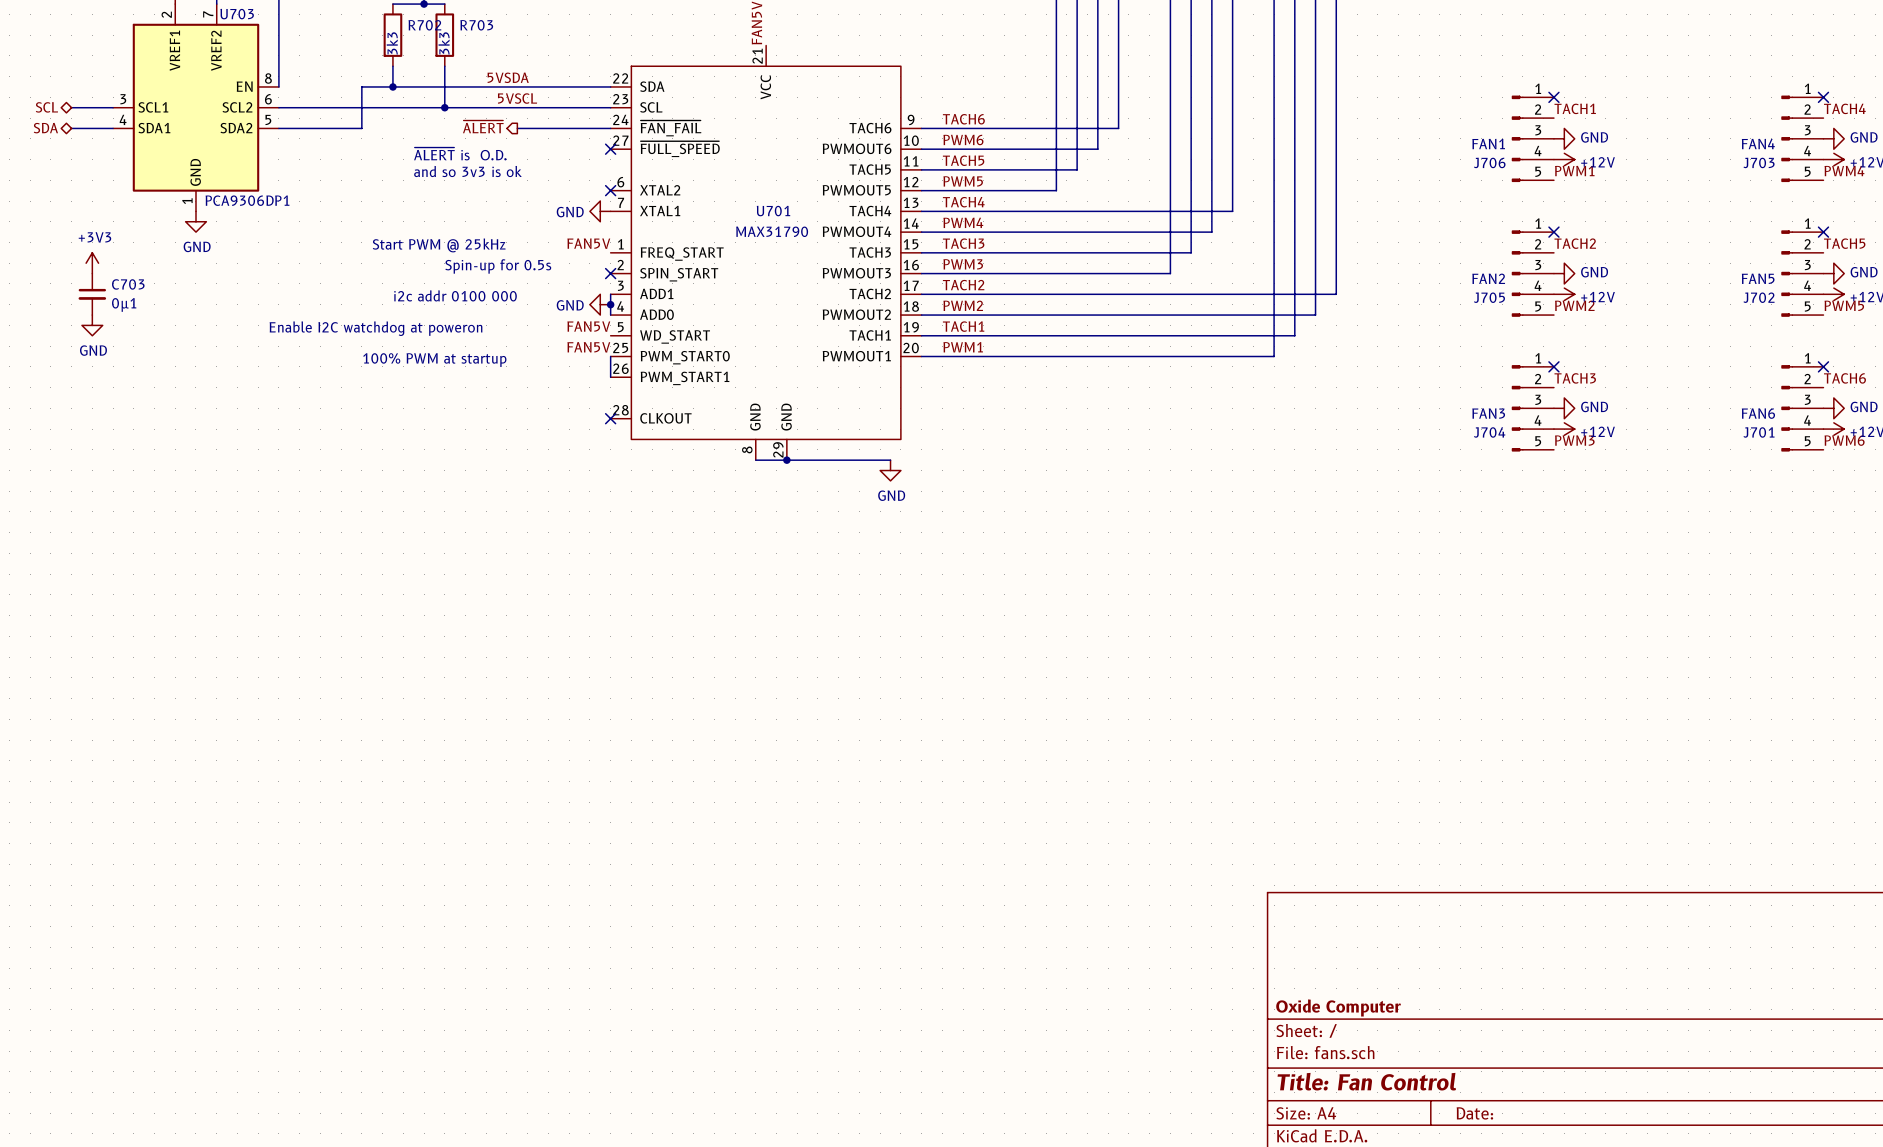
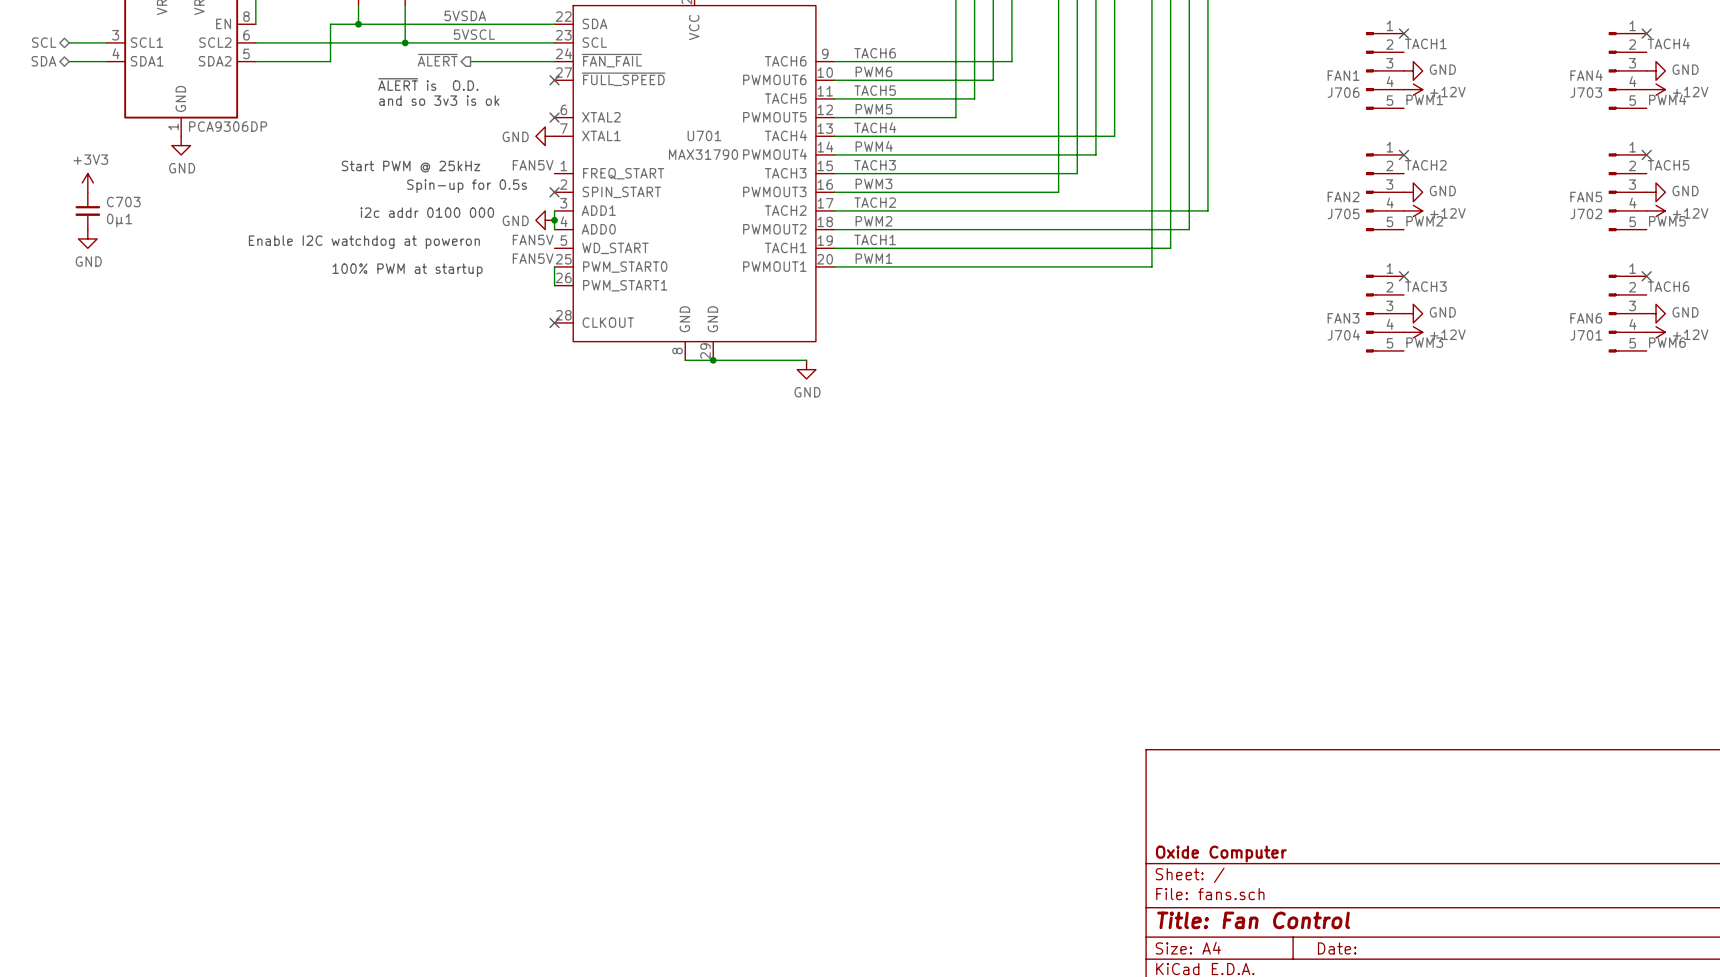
U703 value: PCA9306DP1 (247, 200) -> PCA9306DP (228, 126)

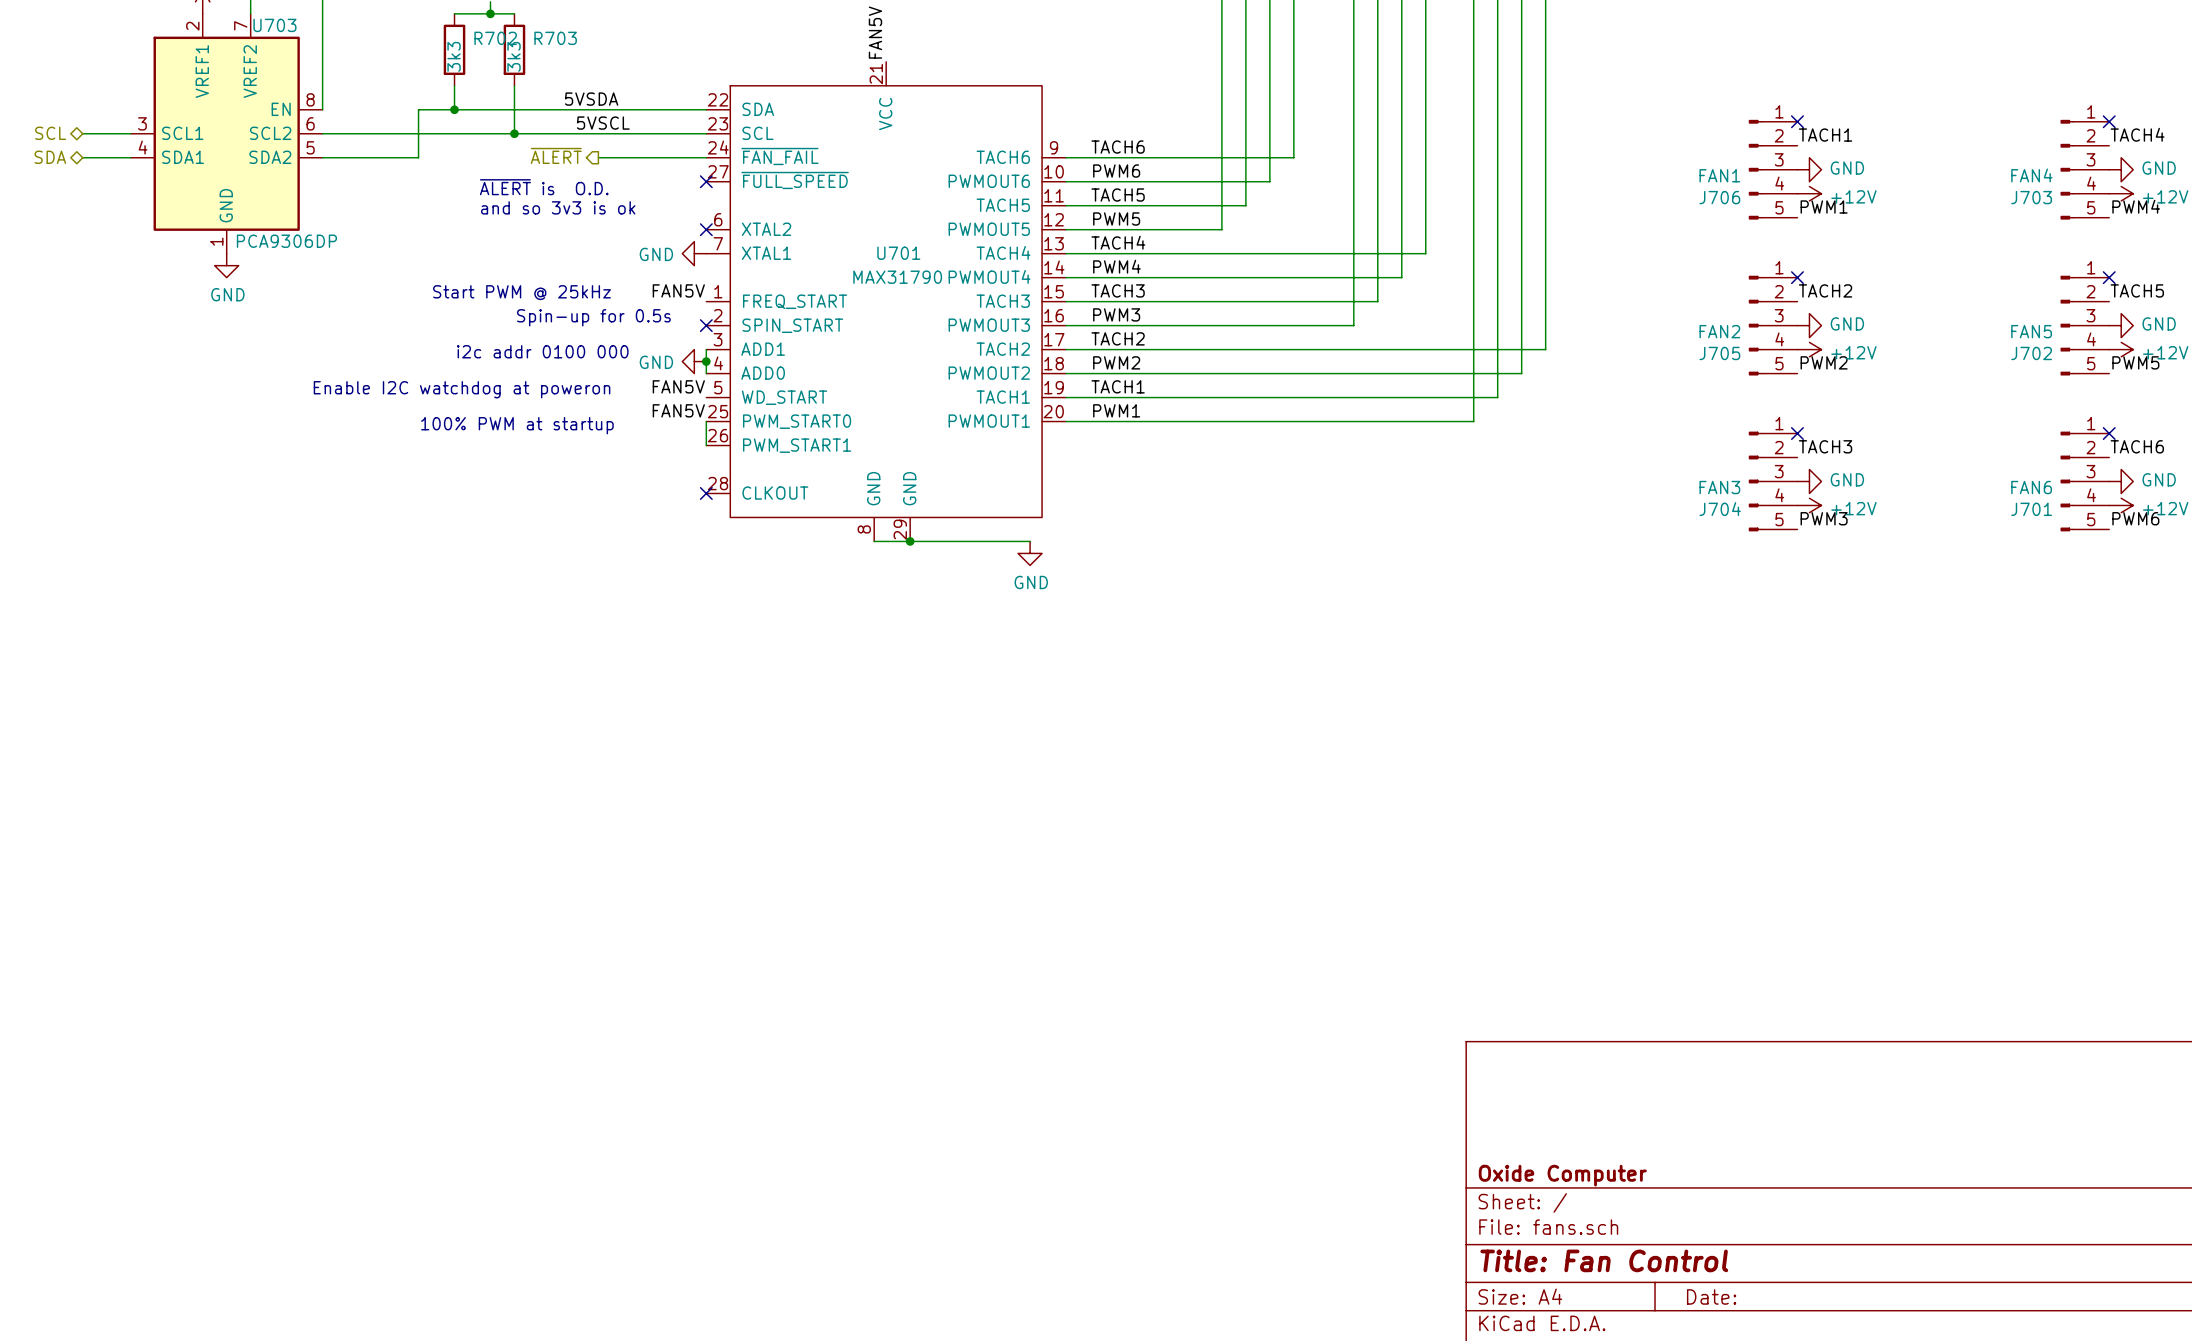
power symbol: +3V3 (87, 182) -> none
C703: 0µ1 (87, 210) -> none
power symbol: GND (87, 238) -> none

